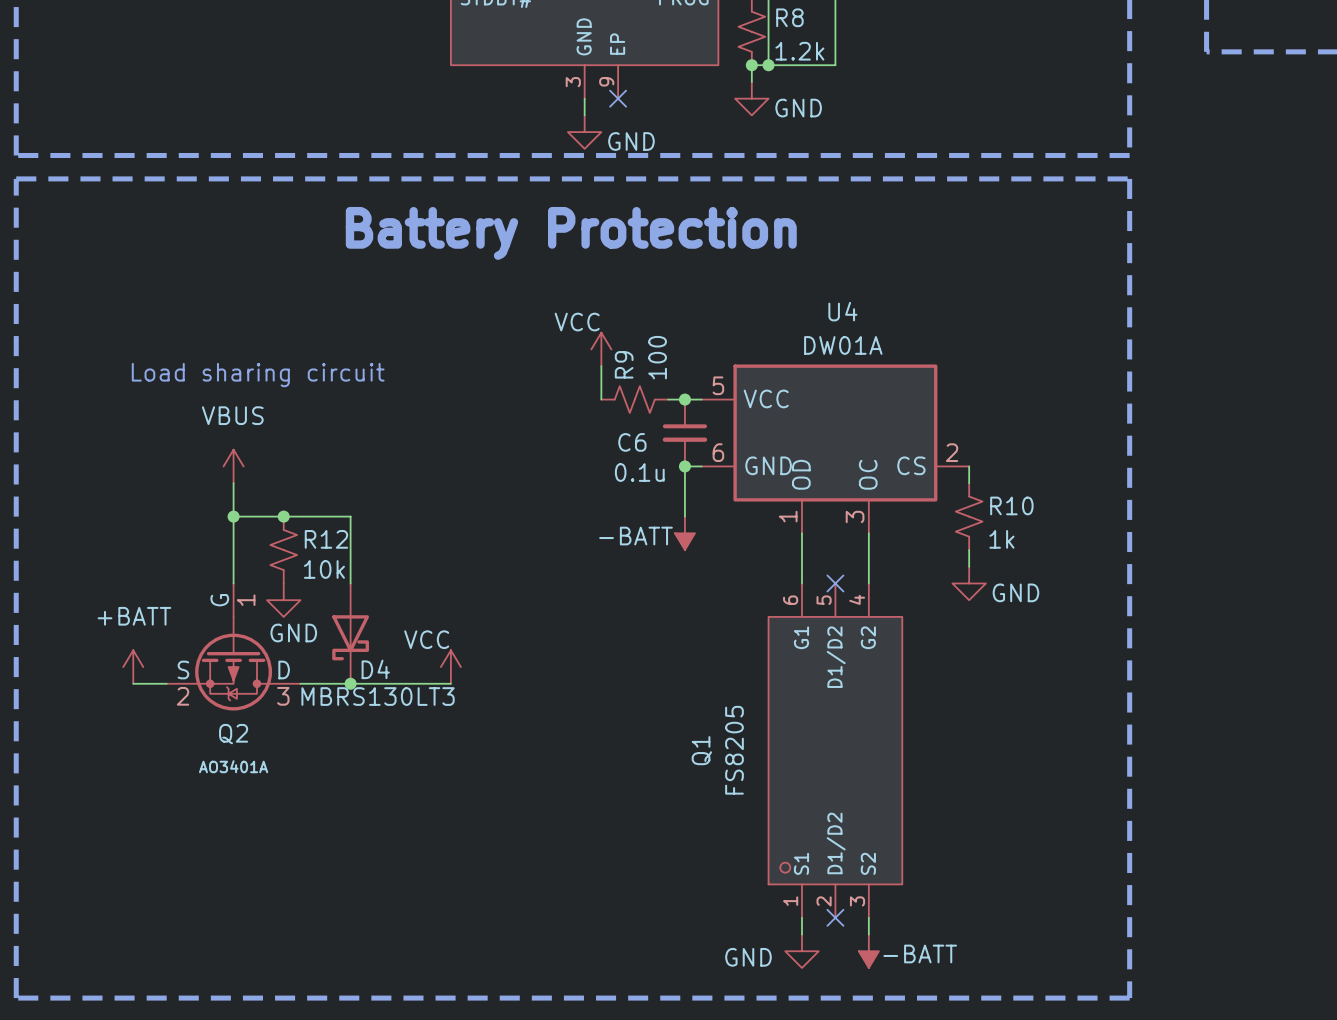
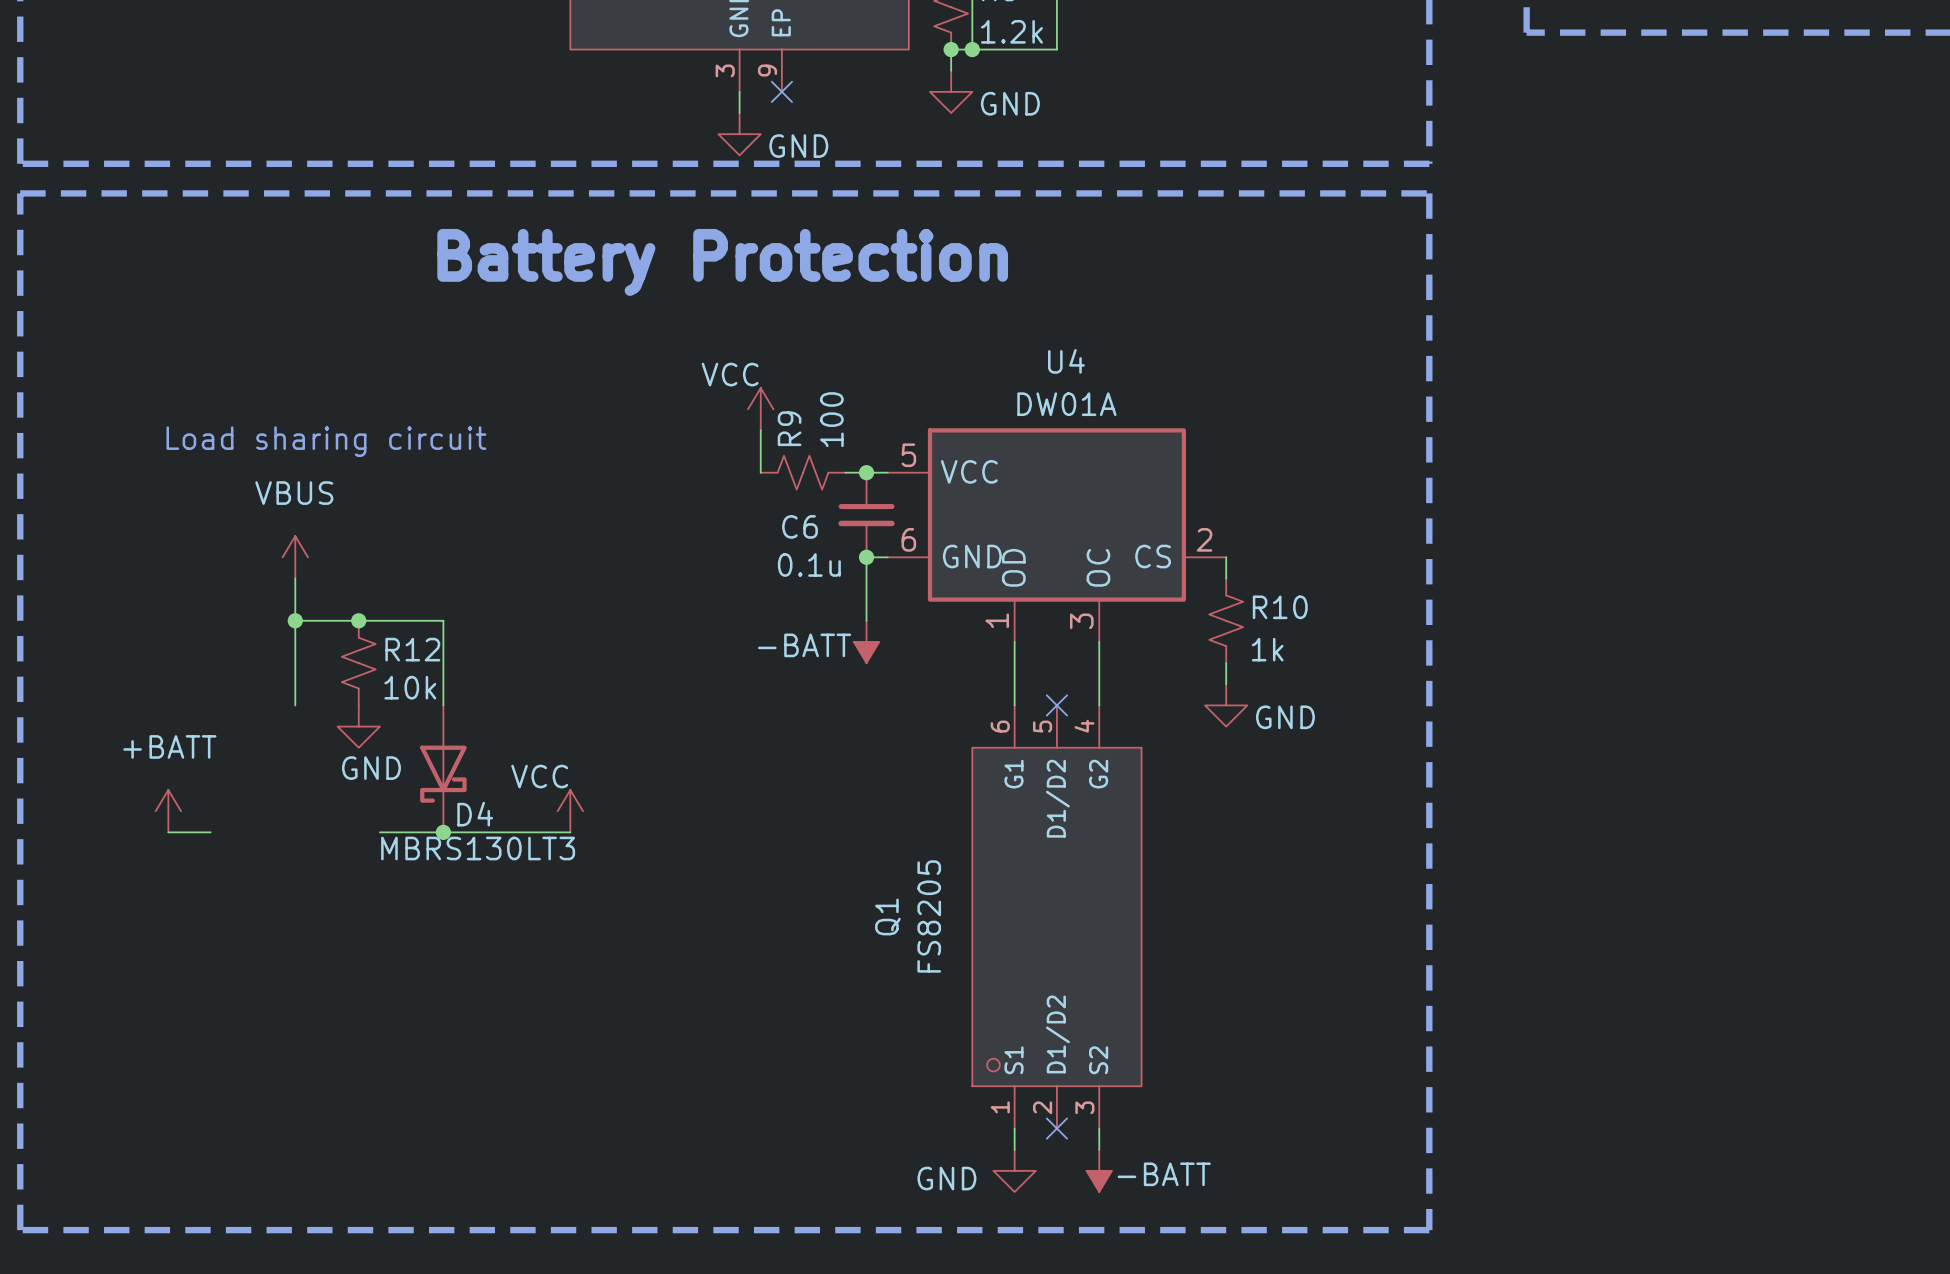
Q2: AO3401A (233, 647) -> none

